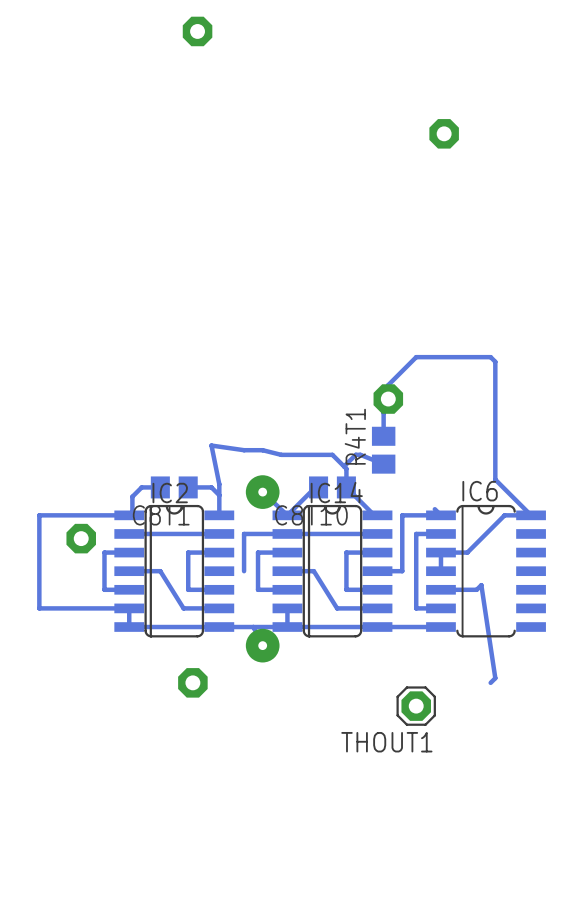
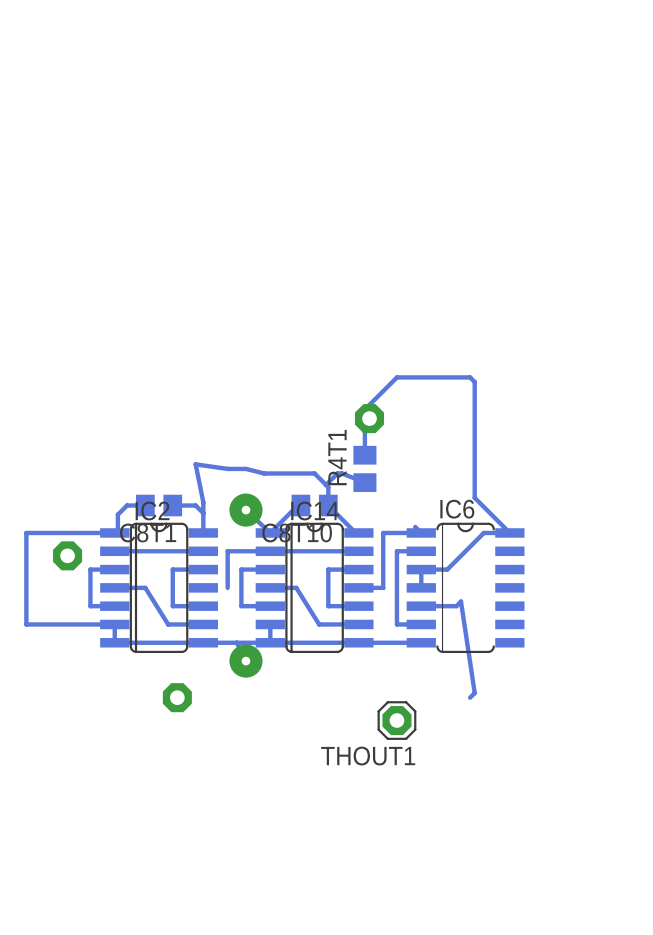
part: (197, 31) -> none
part: (444, 133) -> none

